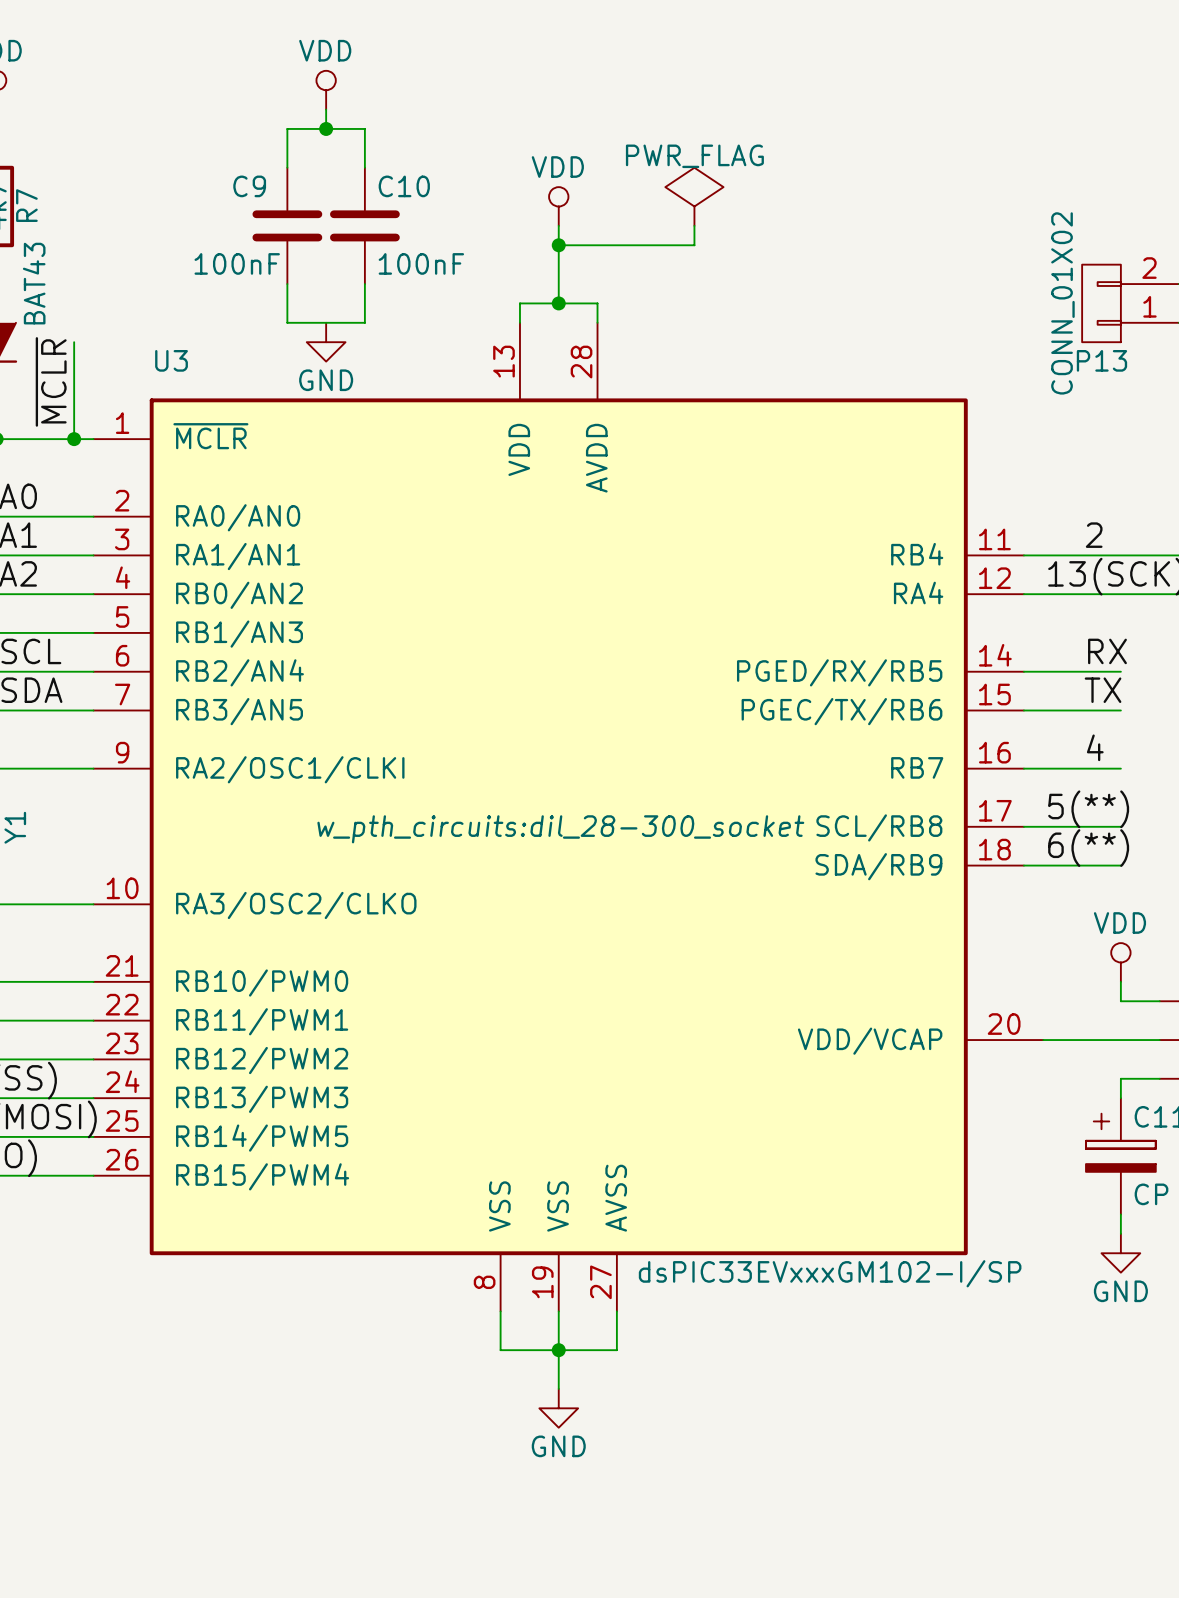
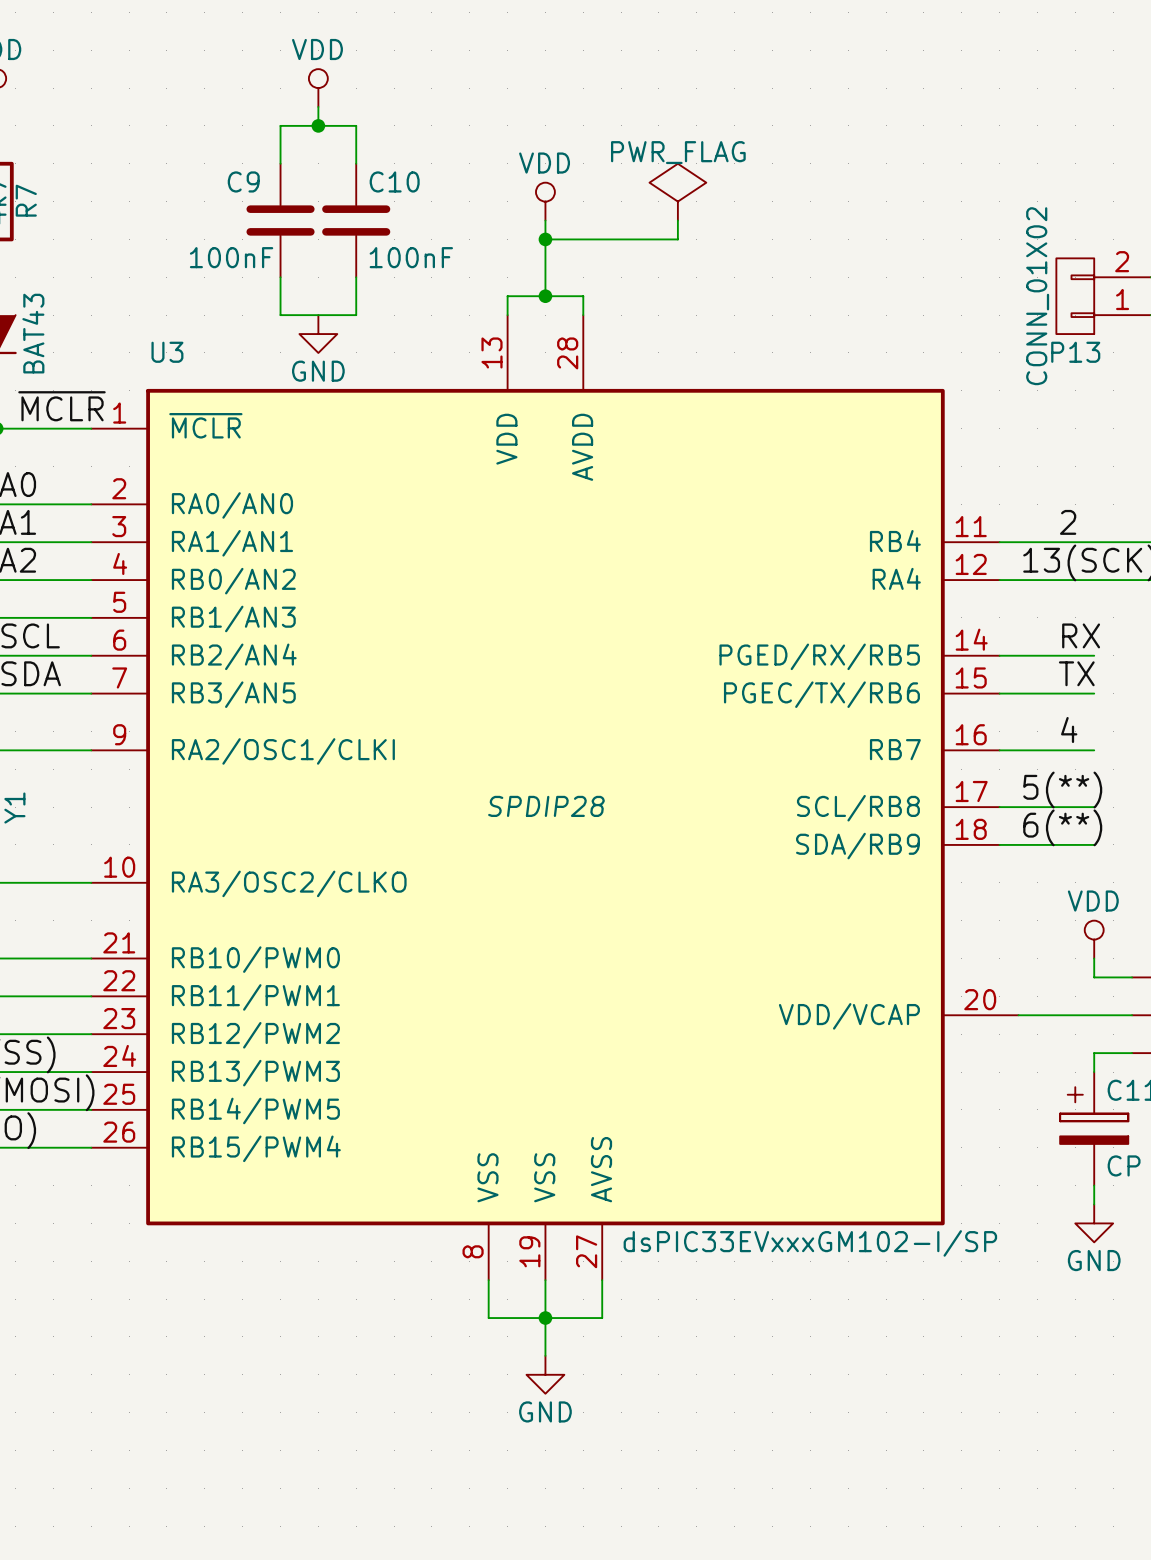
part value position: BAT43 (34, 283) -> BAT43 (33, 333)
wire: (74, 342) (74, 439) -> none
label rotation: 0° (51, 381) -> 90° clockwise (61, 406)
junction: (74, 439) -> none
U3 text: w_pth_circuits:dil_28-300_socket (560, 829) -> SPDIP28 (546, 806)

